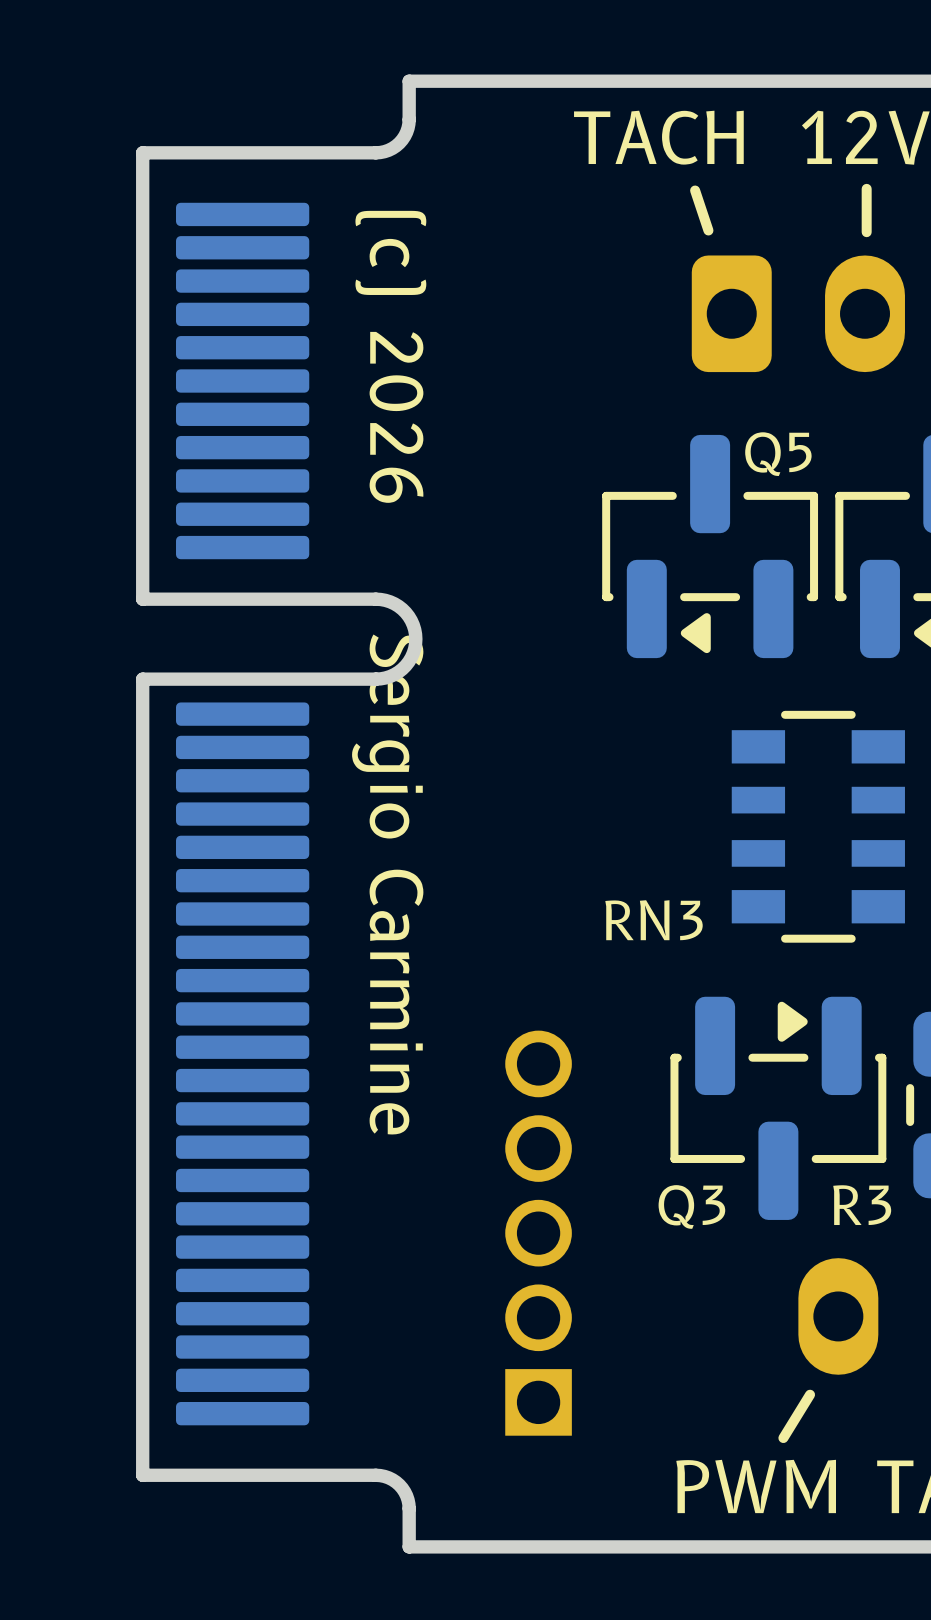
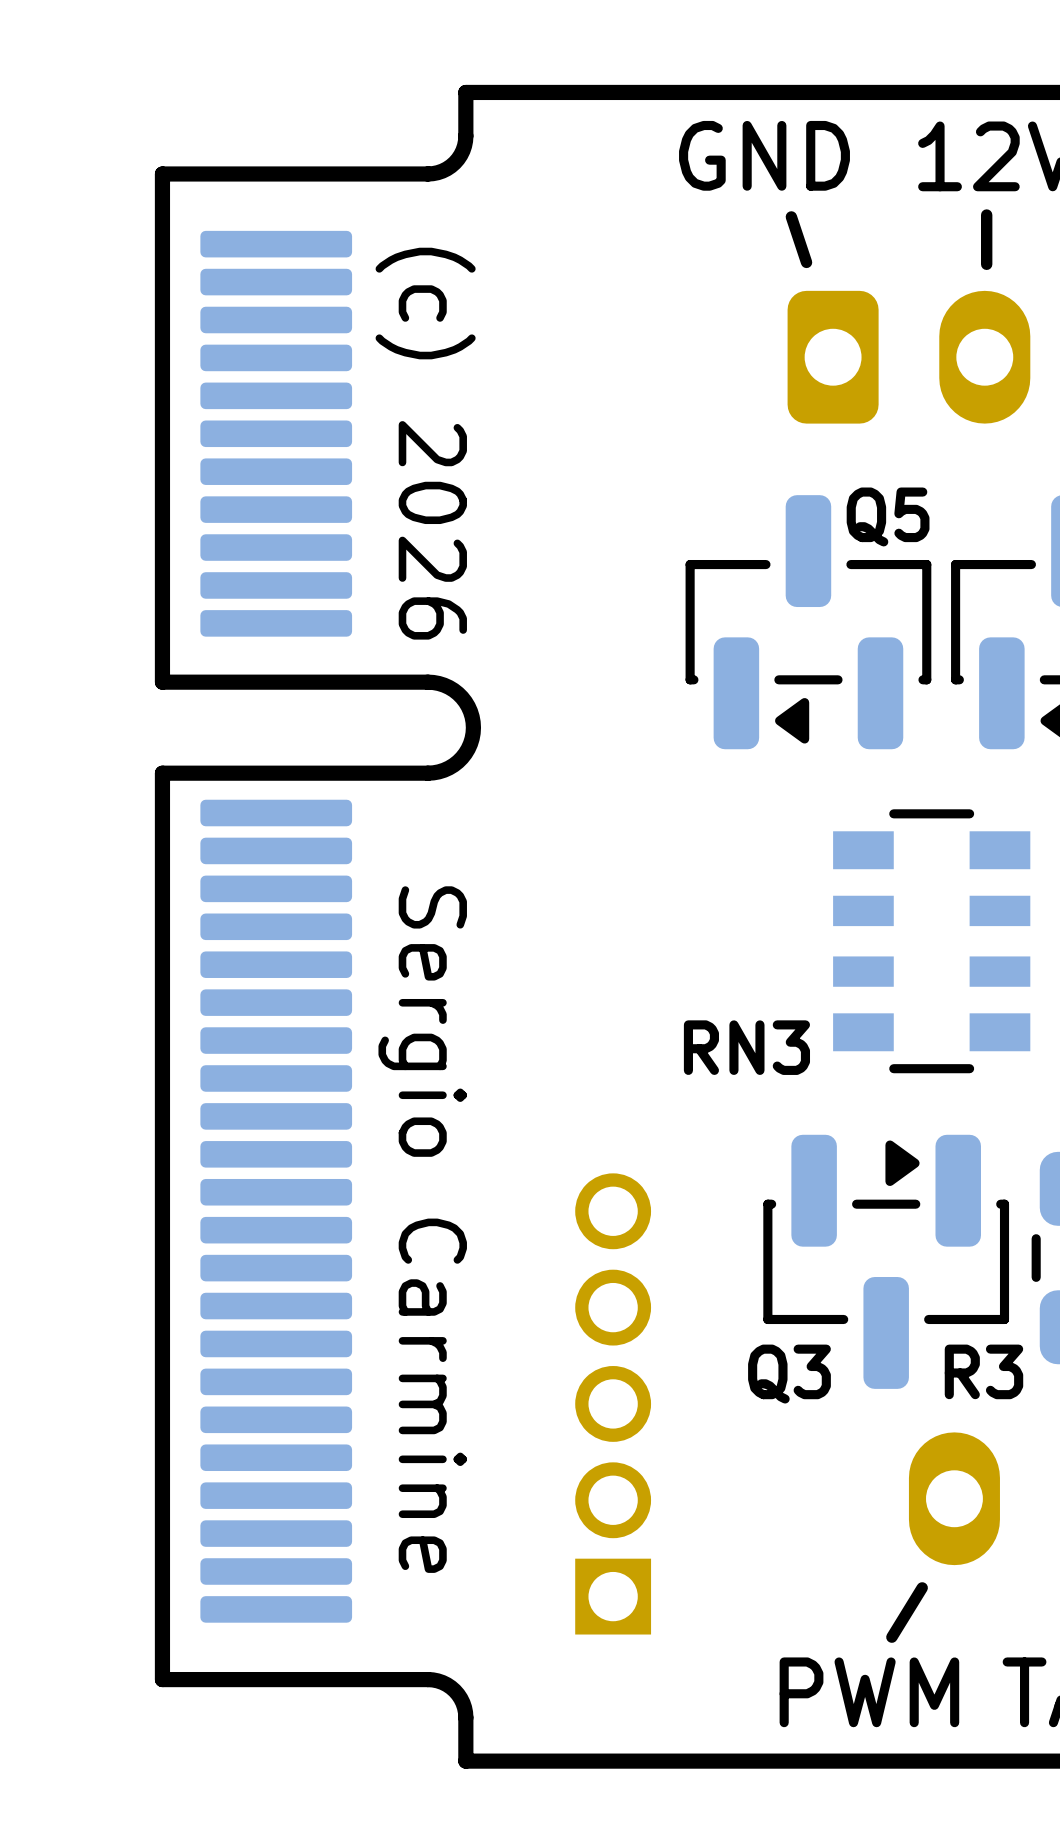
text: TACH (658, 137) -> GND (764, 155)
text position: (c) 2026 Sergio Carmine (389, 672) -> (c) 2026 Sergio Carmine (425, 910)

